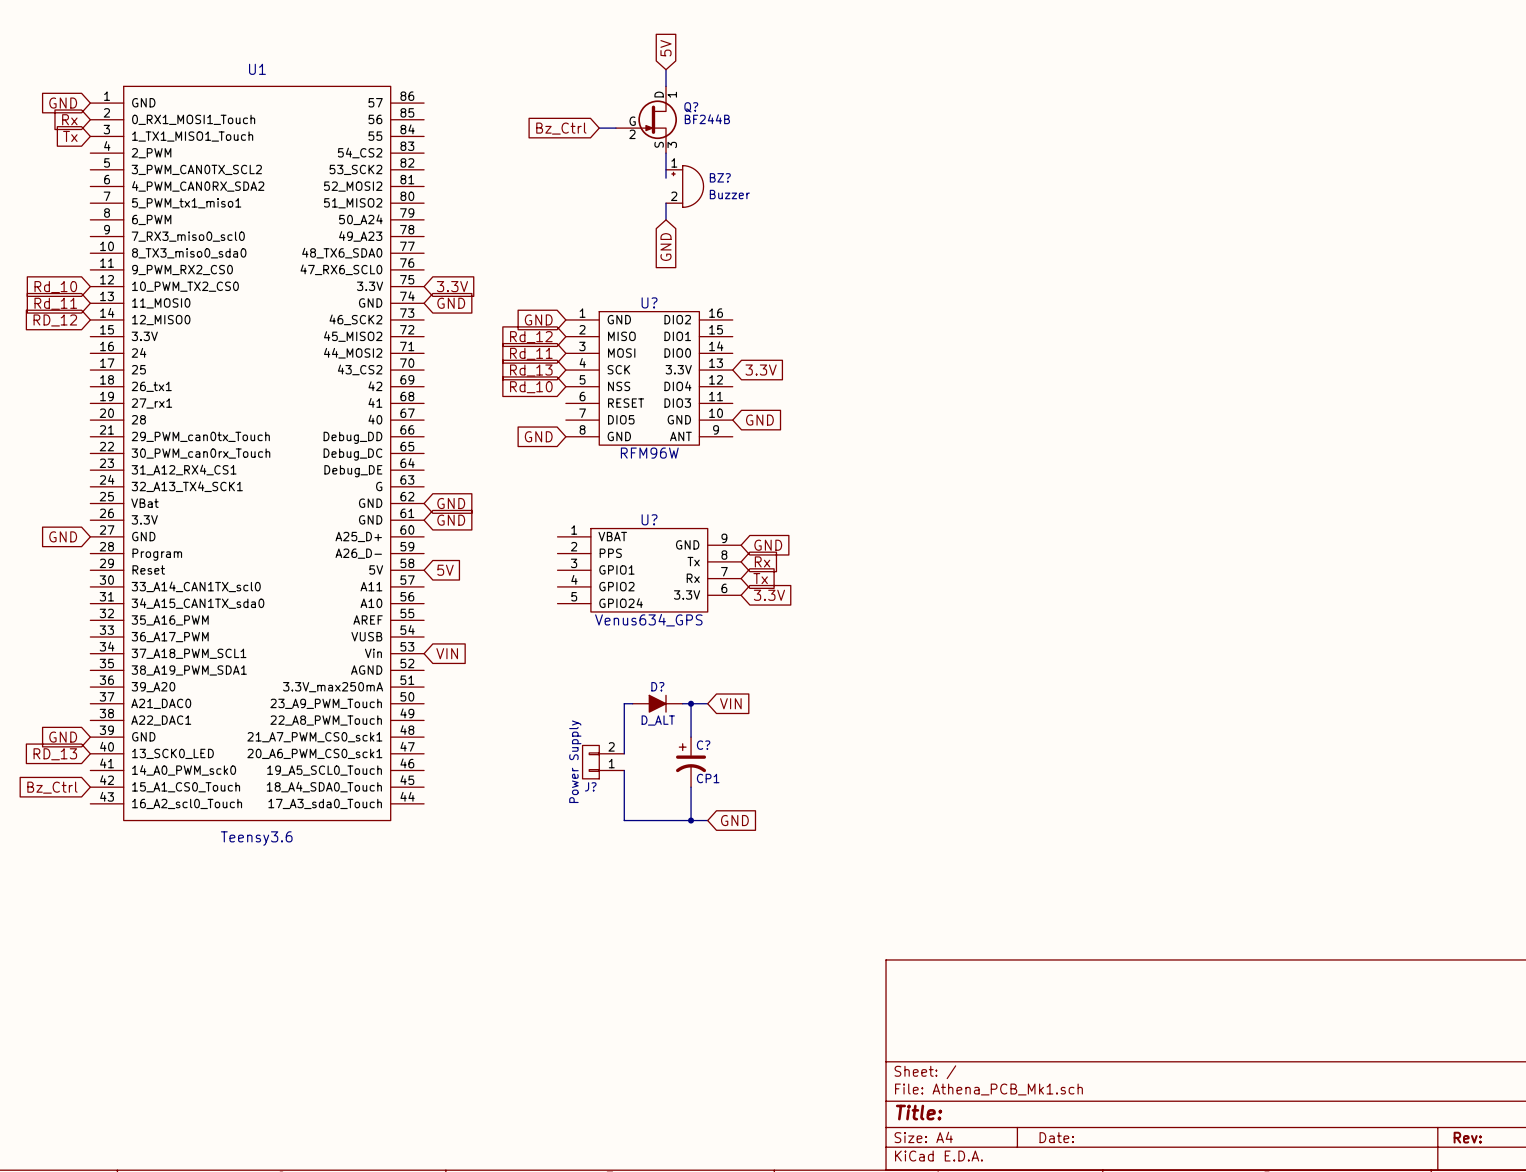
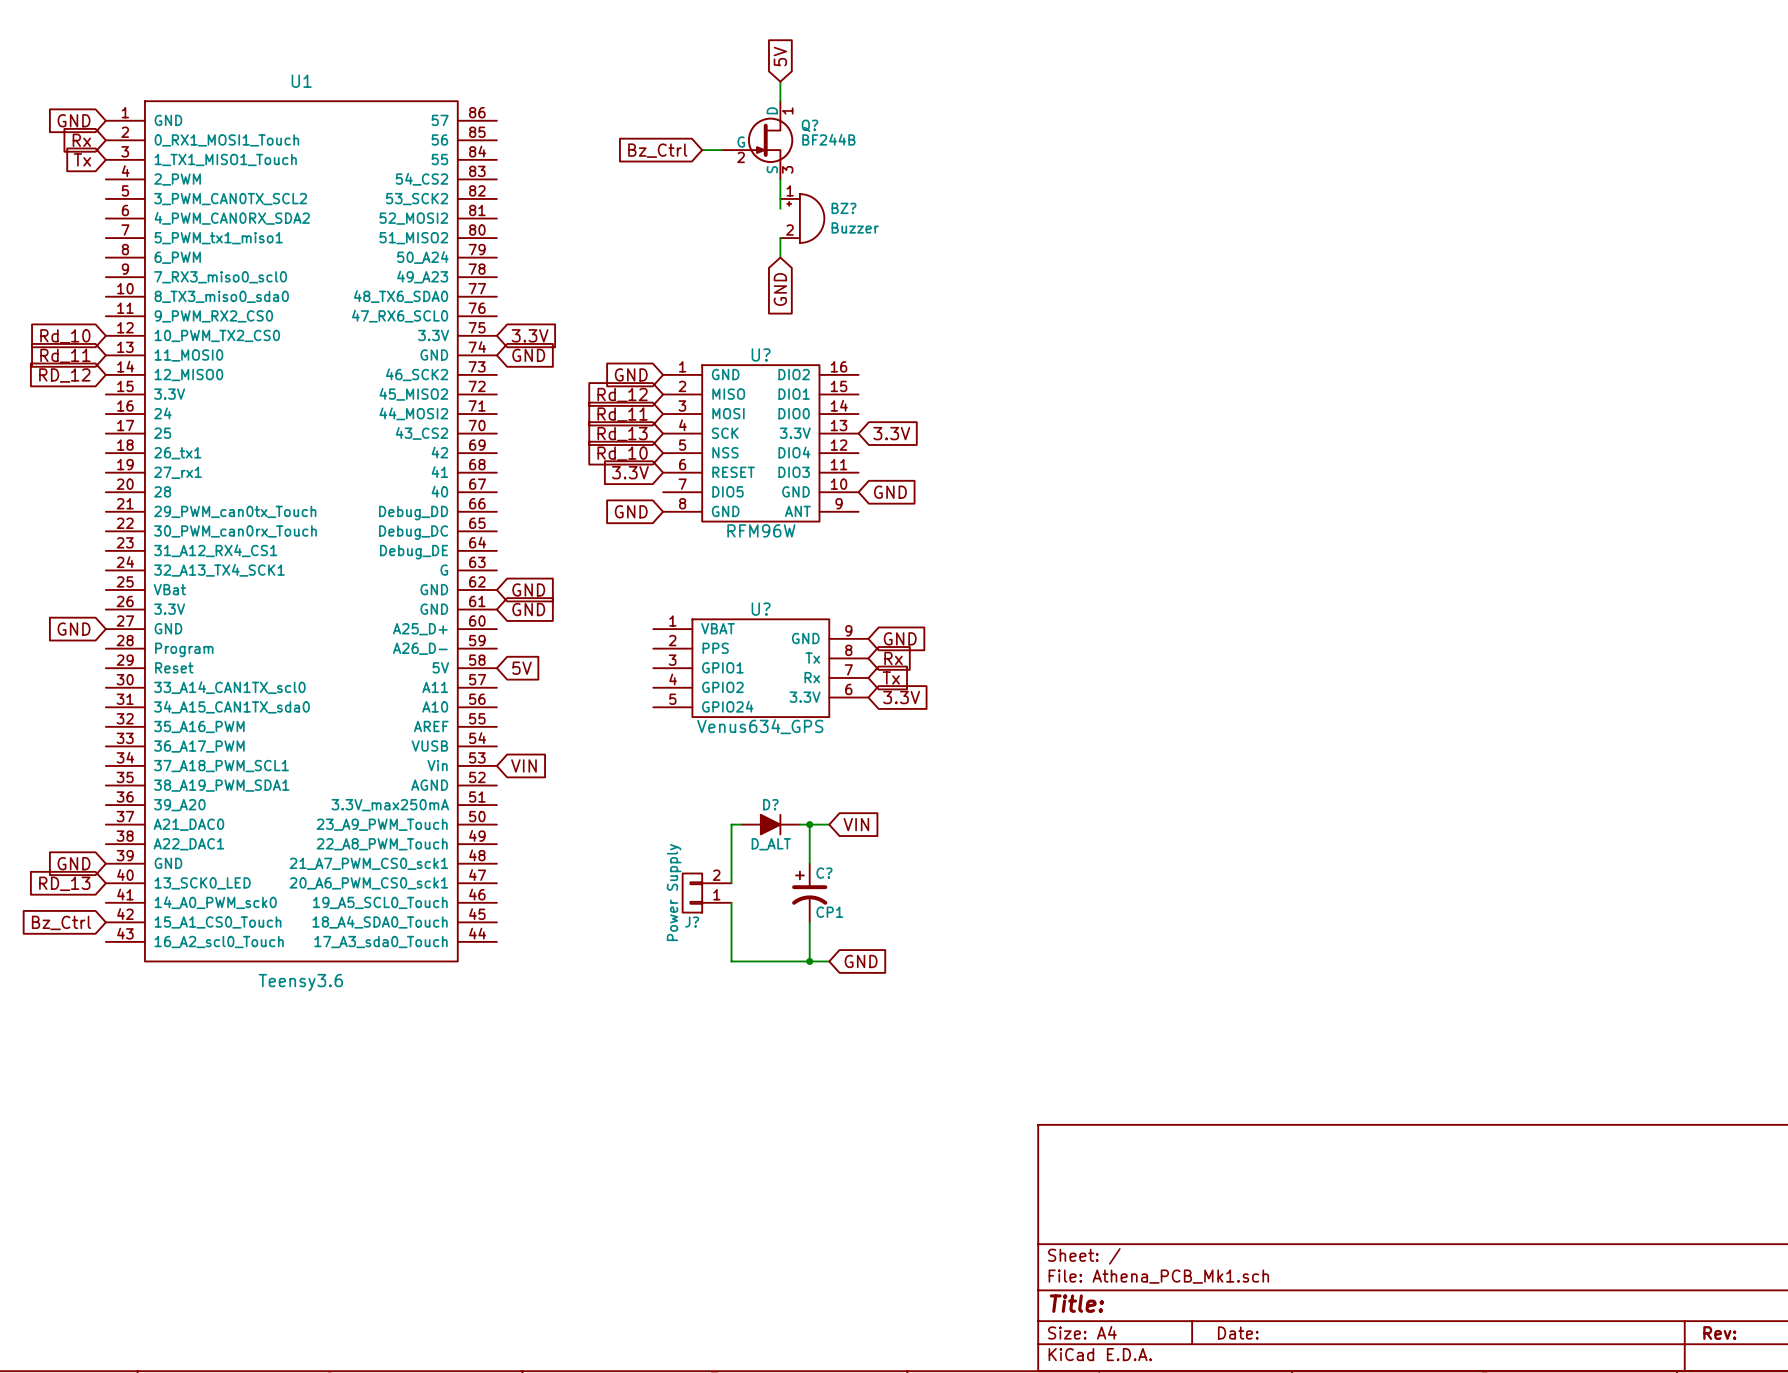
global label: none -> 3.3V (630, 472)

